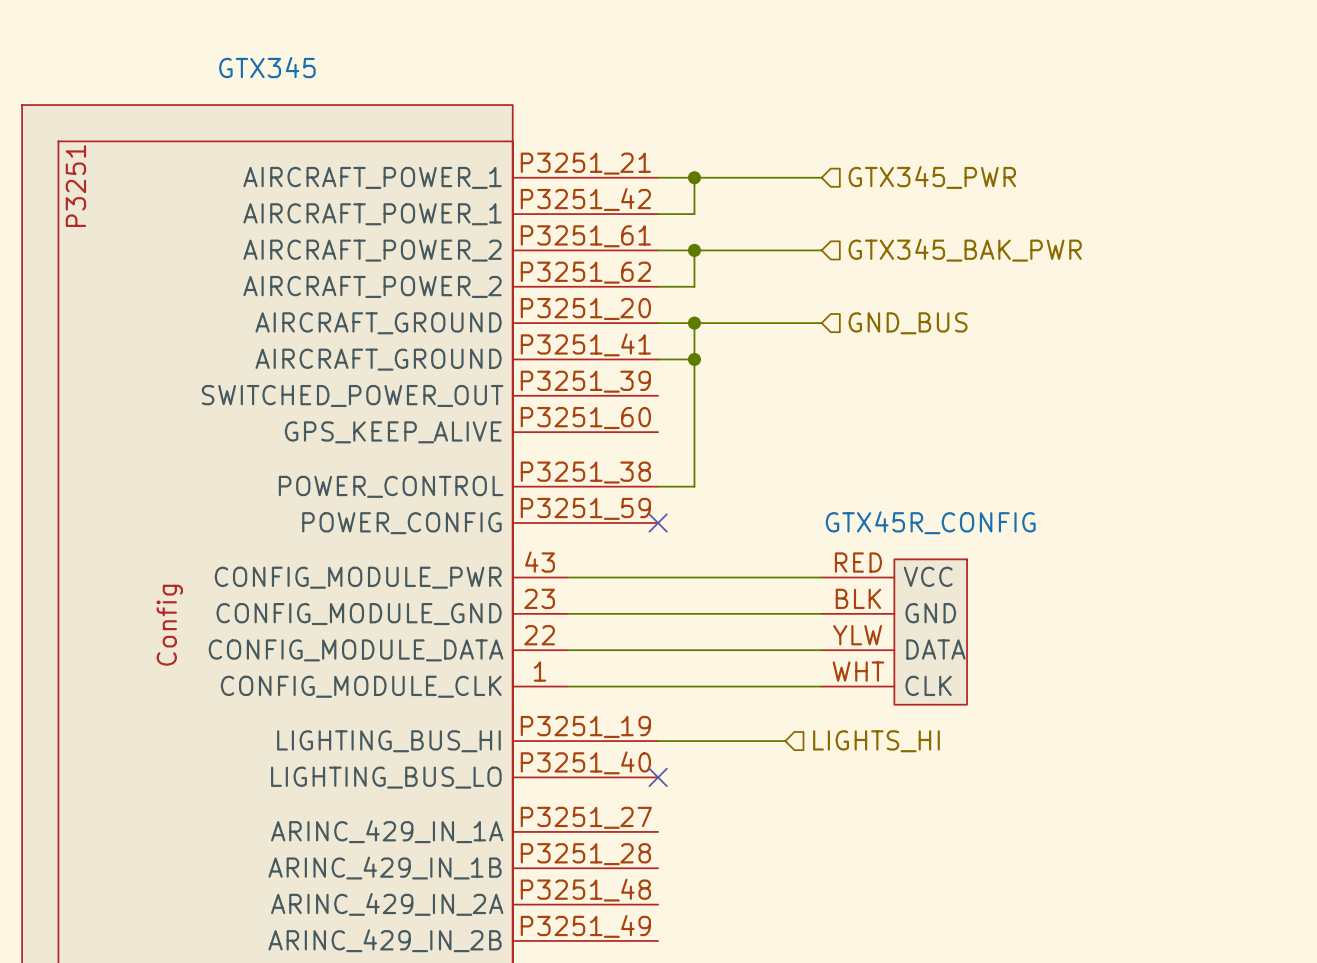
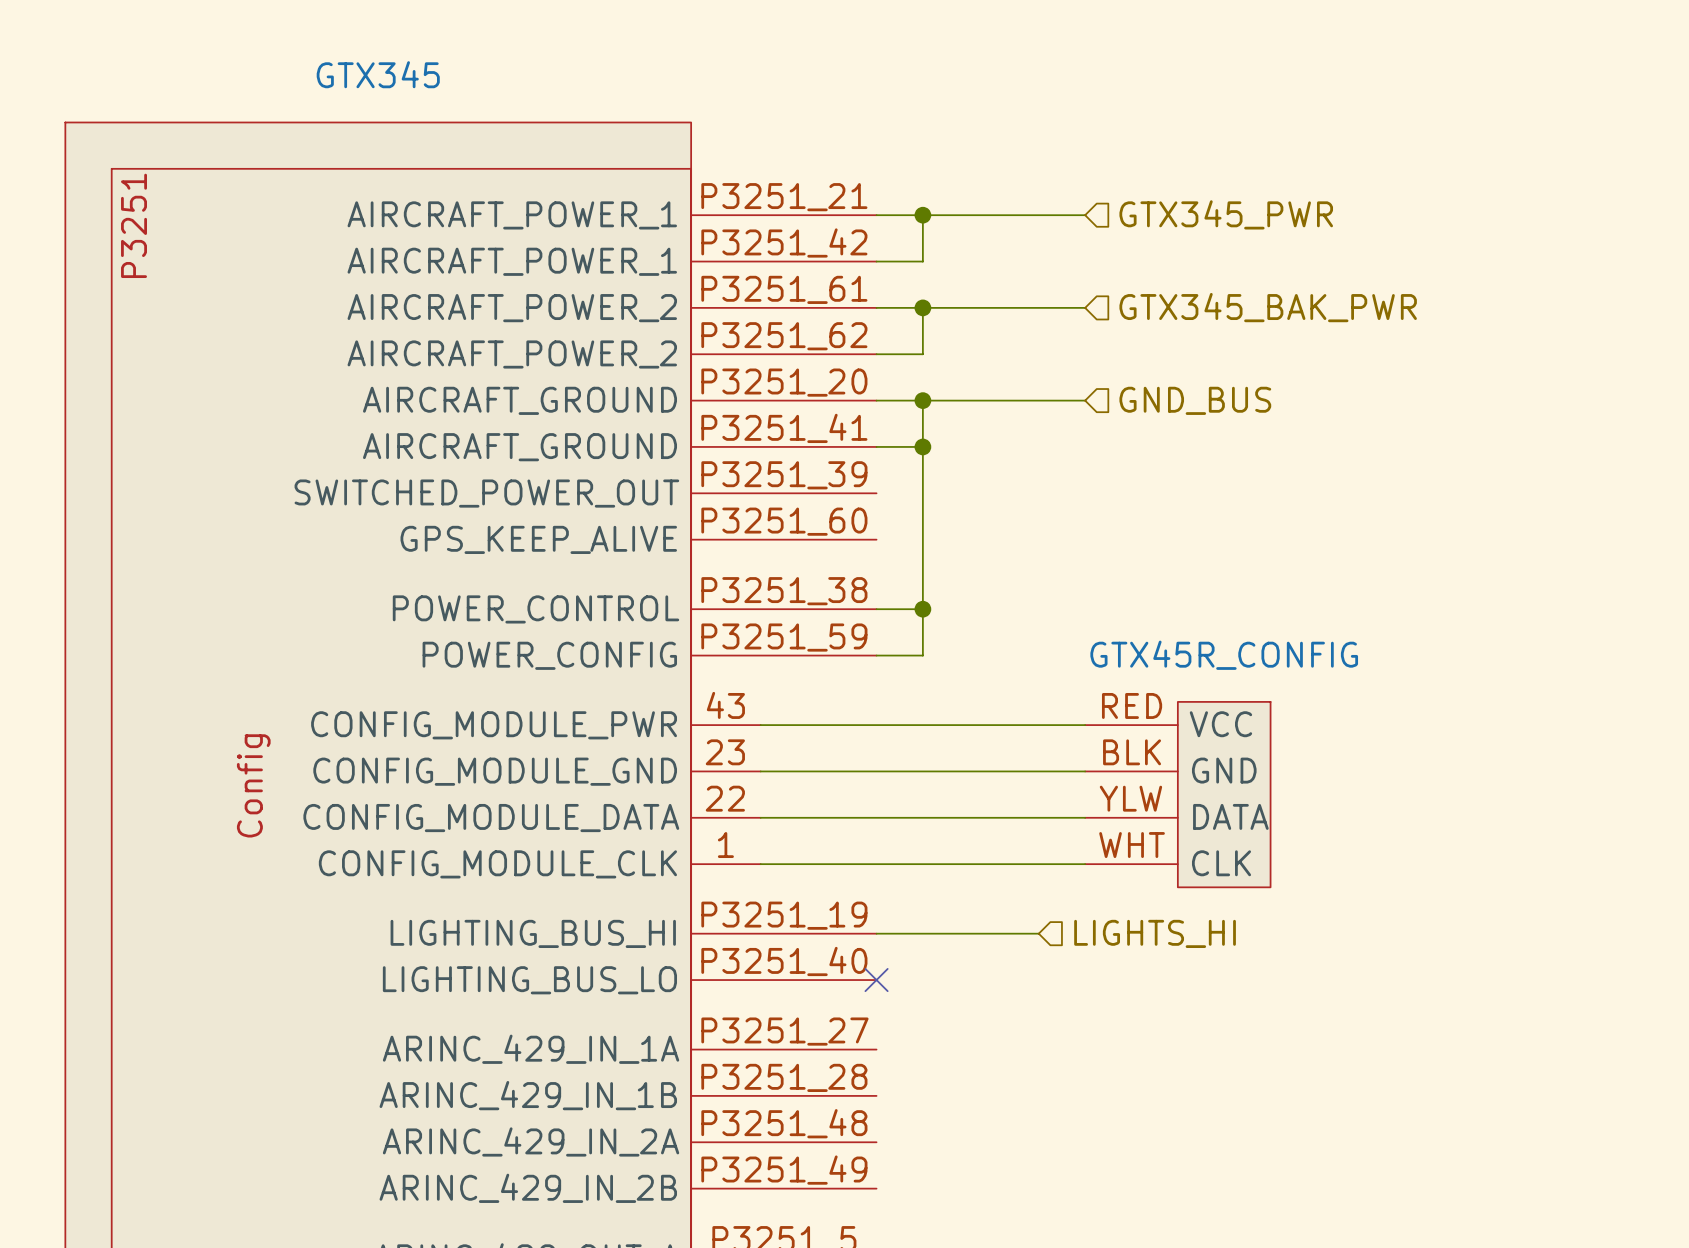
wire: none -> (922, 609) (922, 655) (876, 655)
junction: none -> (922, 609)
no-connect mark: (658, 523) -> none

